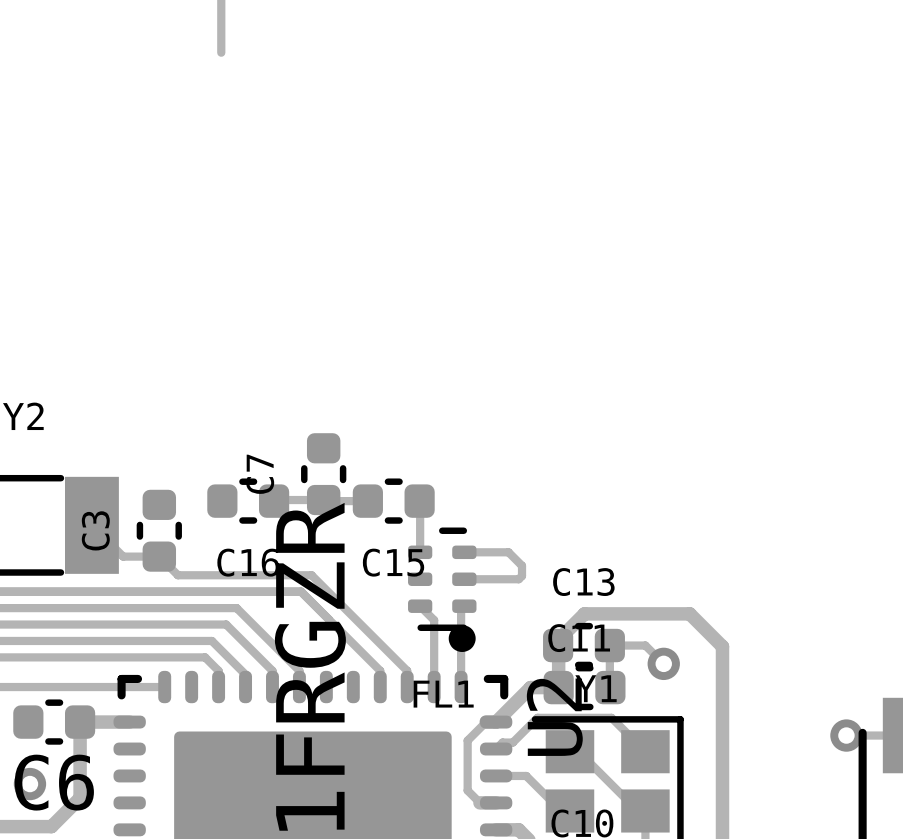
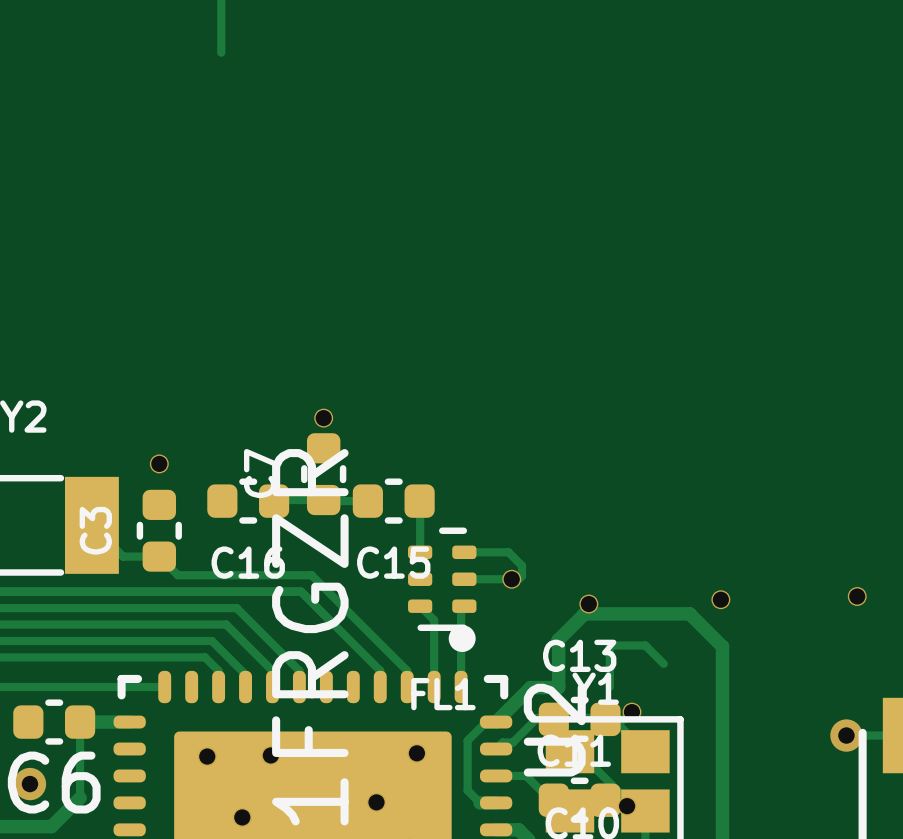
via: none -> (323, 418)
via: none -> (159, 463)
via: none -> (511, 579)
via: none -> (857, 596)
via: none -> (720, 599)
via: none -> (588, 604)
C13 position: (583, 645) -> (579, 719)
via: (663, 663) -> none
C11 position: (584, 687) -> (579, 800)
via: none -> (631, 712)
track width: thick (80, 722) (80, 798) -> thin (80, 722) (80, 798)
via: none -> (416, 753)
via: none -> (270, 755)
via: none -> (207, 756)
via: none -> (376, 802)
via: none -> (627, 806)
via: none -> (242, 817)

